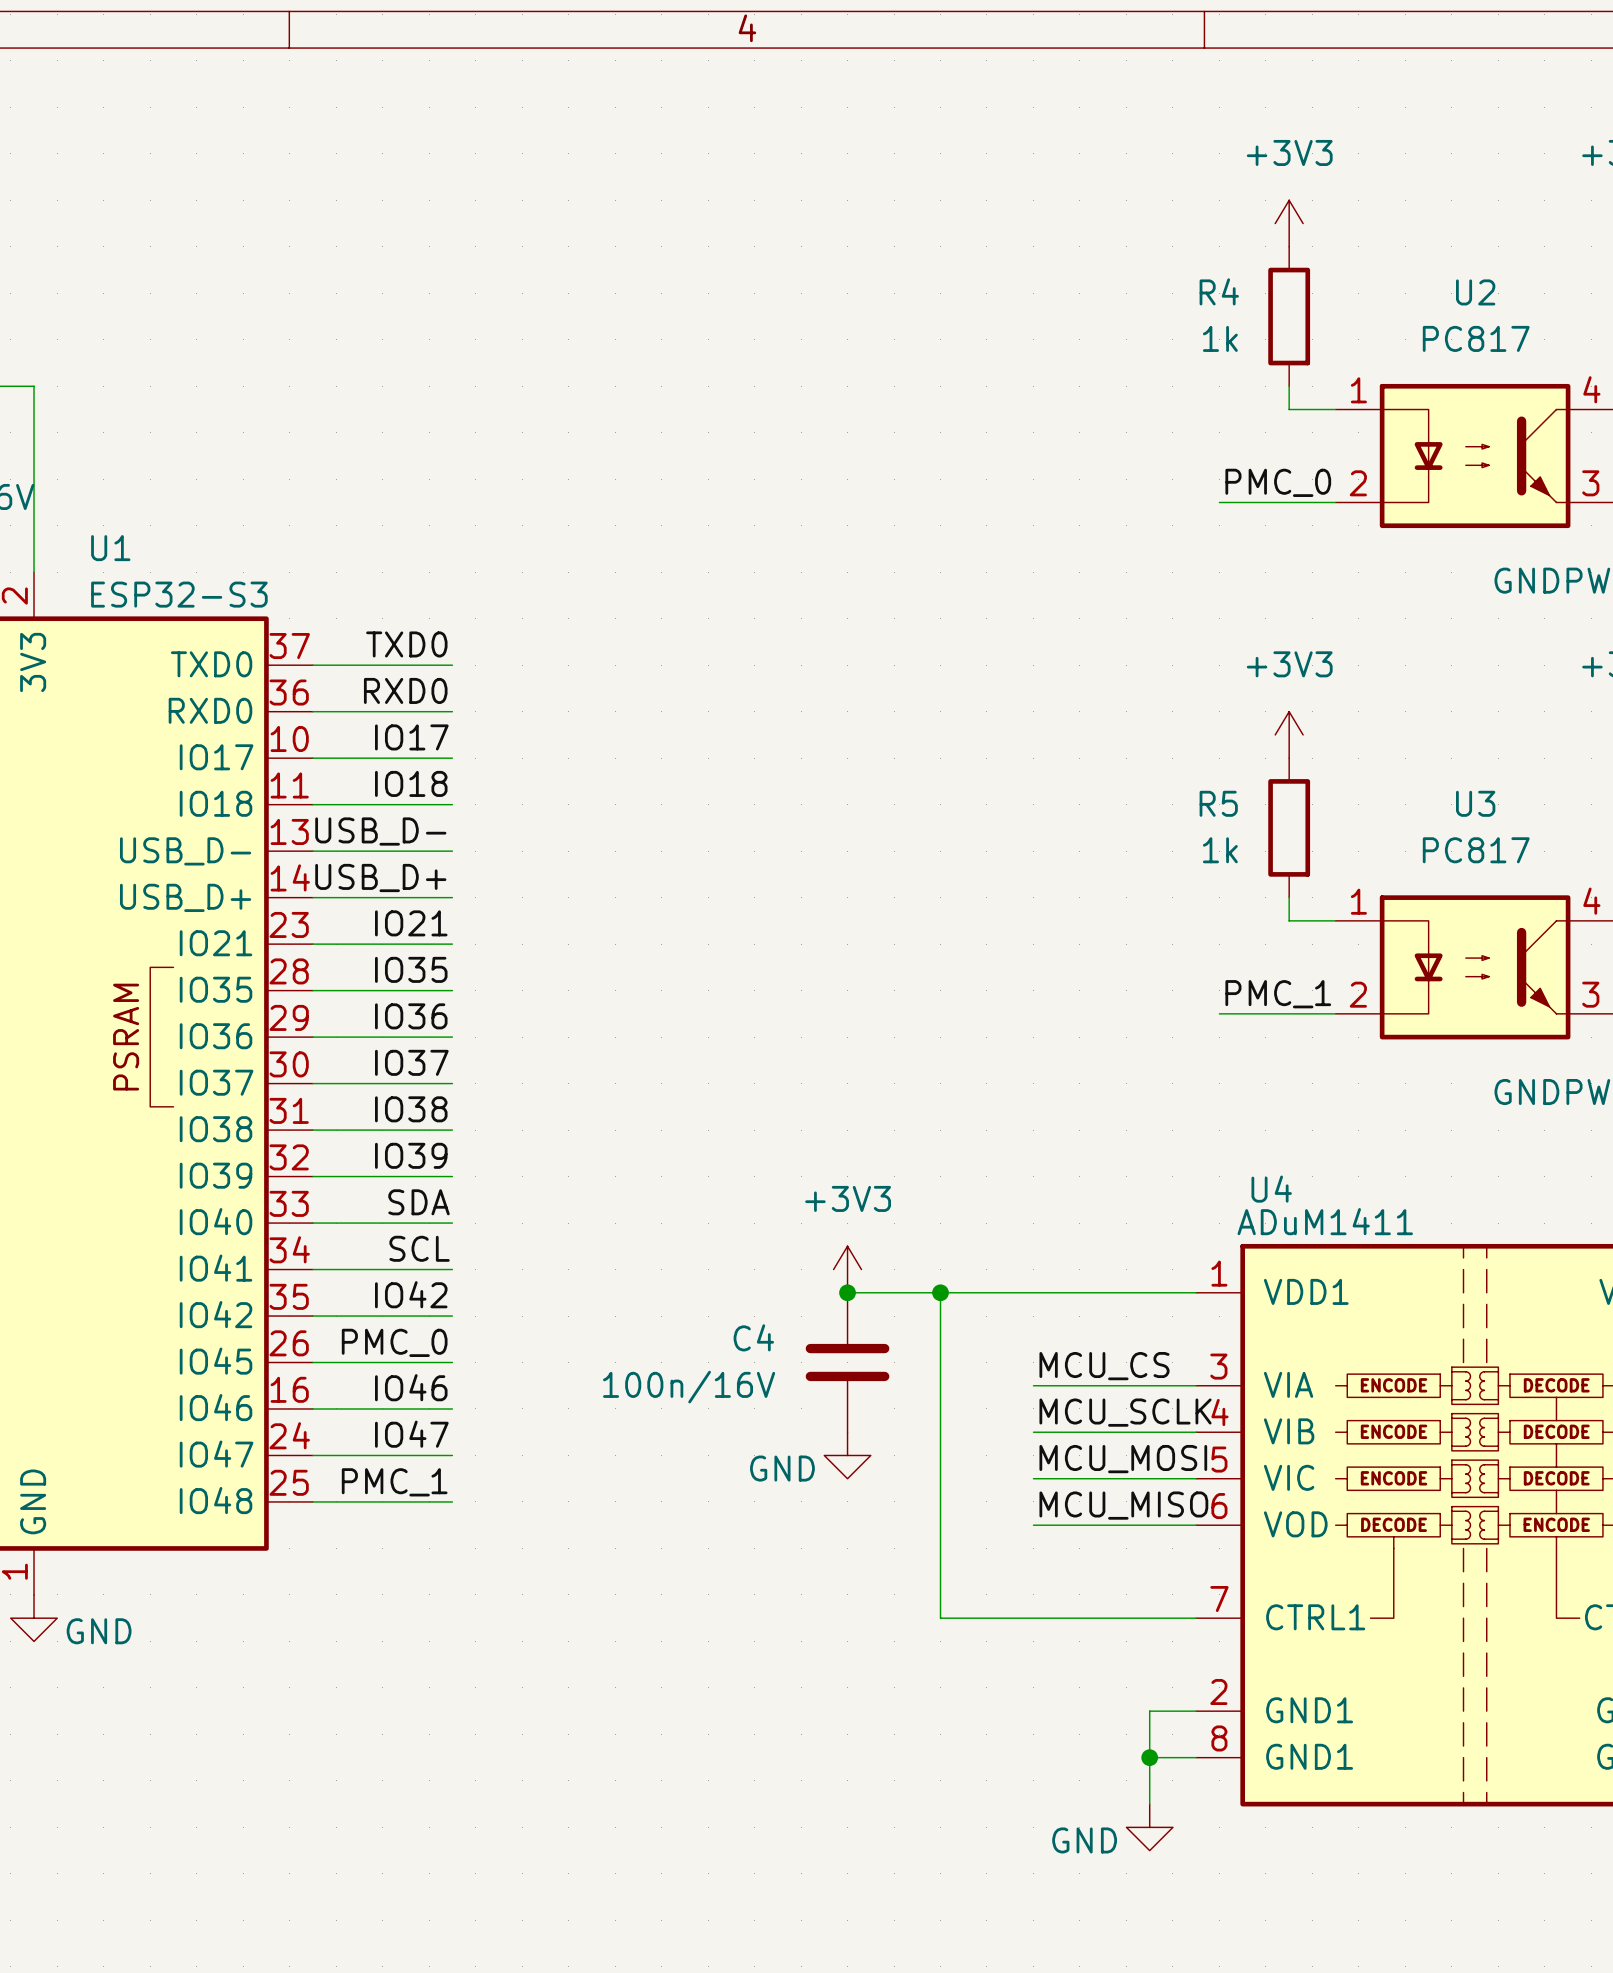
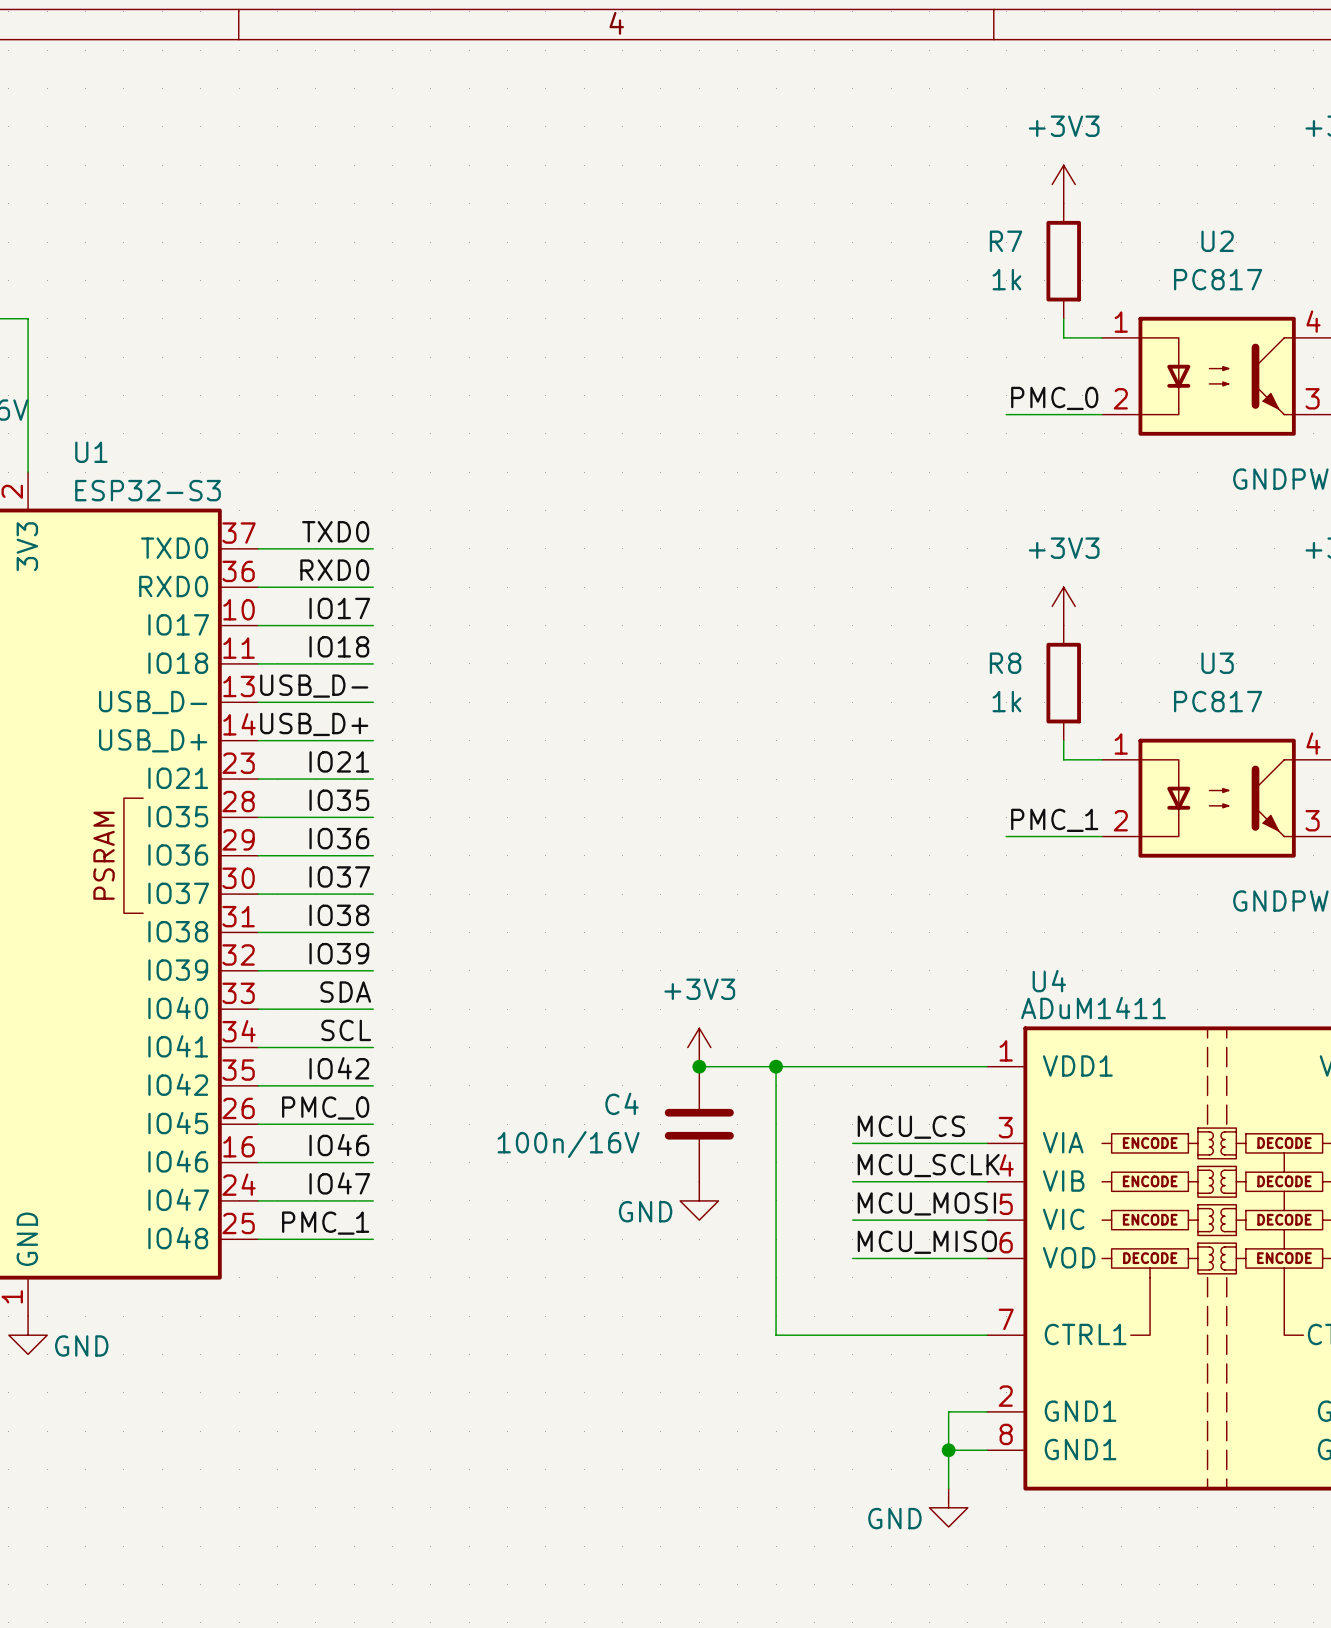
R4 name: R4 (1219, 291) -> R7 (1006, 241)
R5 name: R5 (1218, 803) -> R8 (1005, 663)

